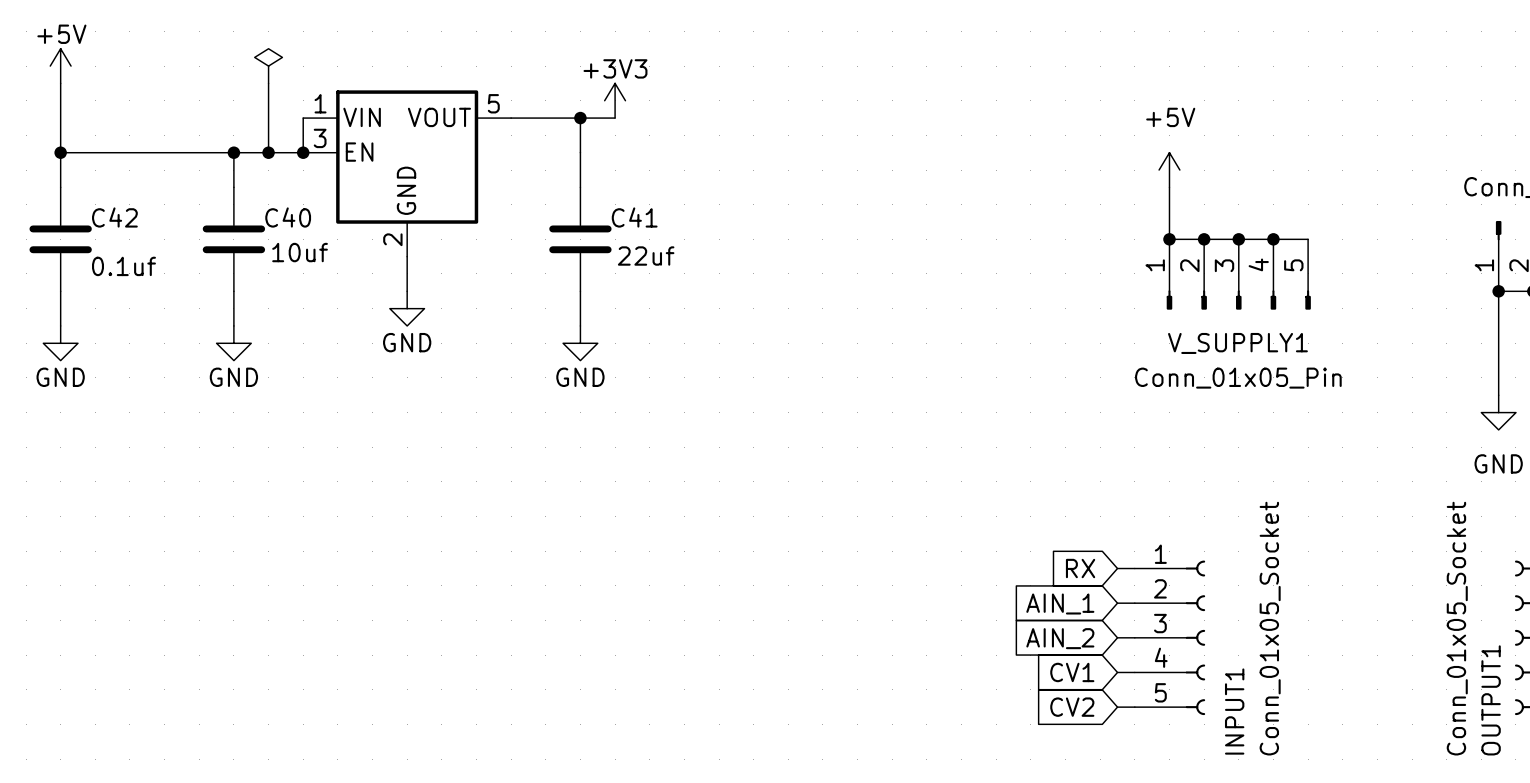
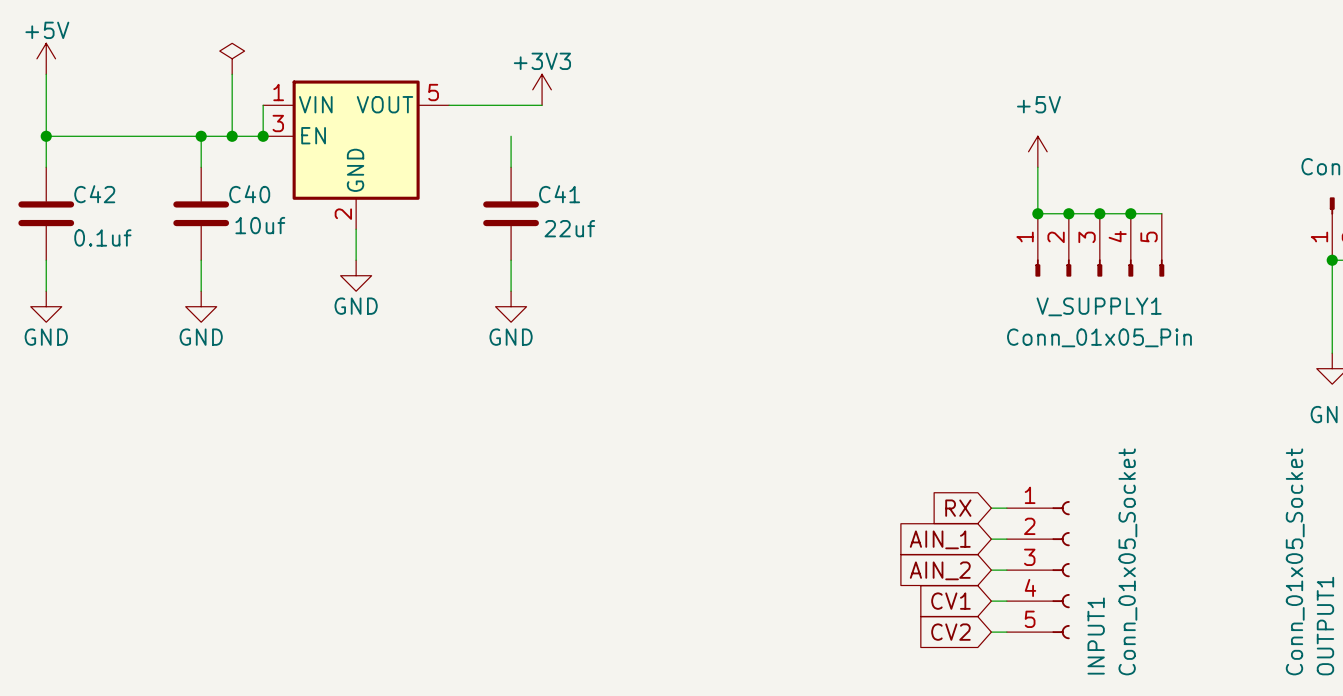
wire: (580, 118) (580, 152) -> none
junction: (580, 118) -> none

